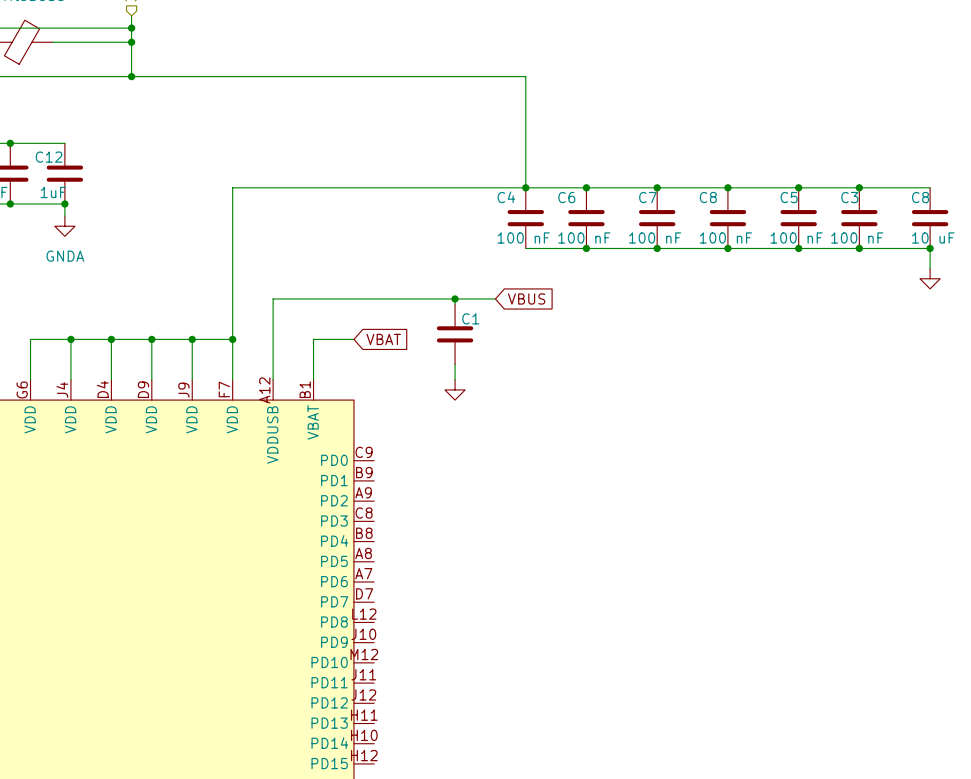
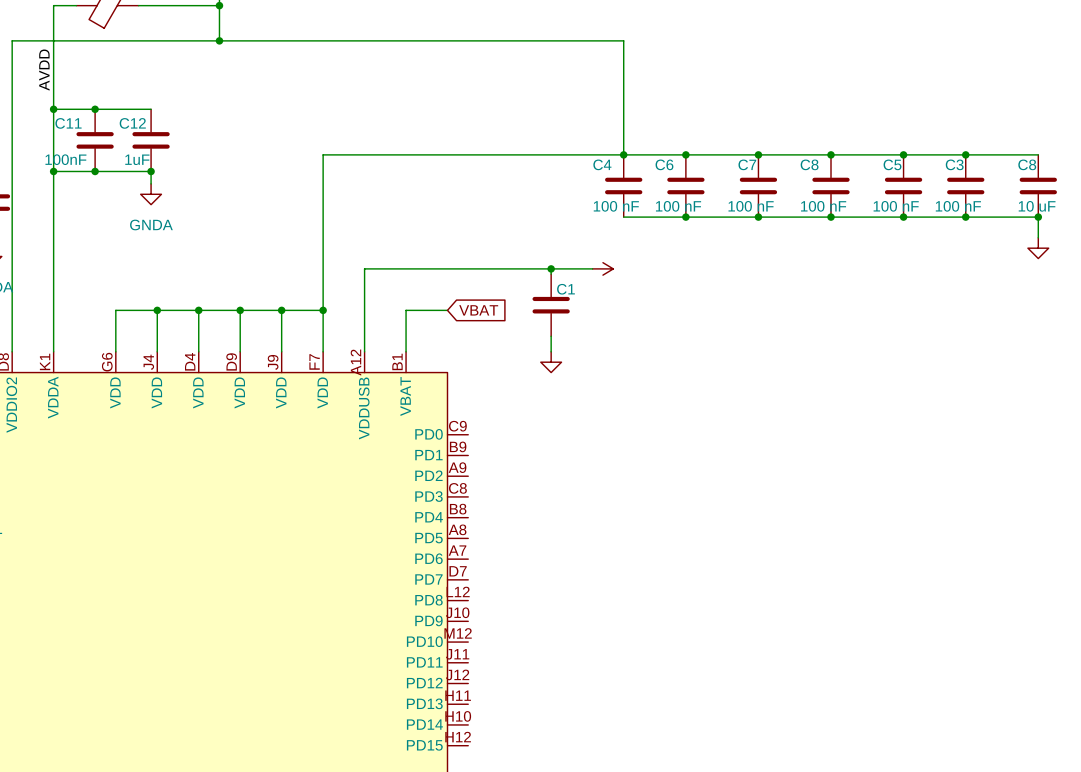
power symbol: none -> (602, 268)
global label: VBUS (526, 298) -> none

